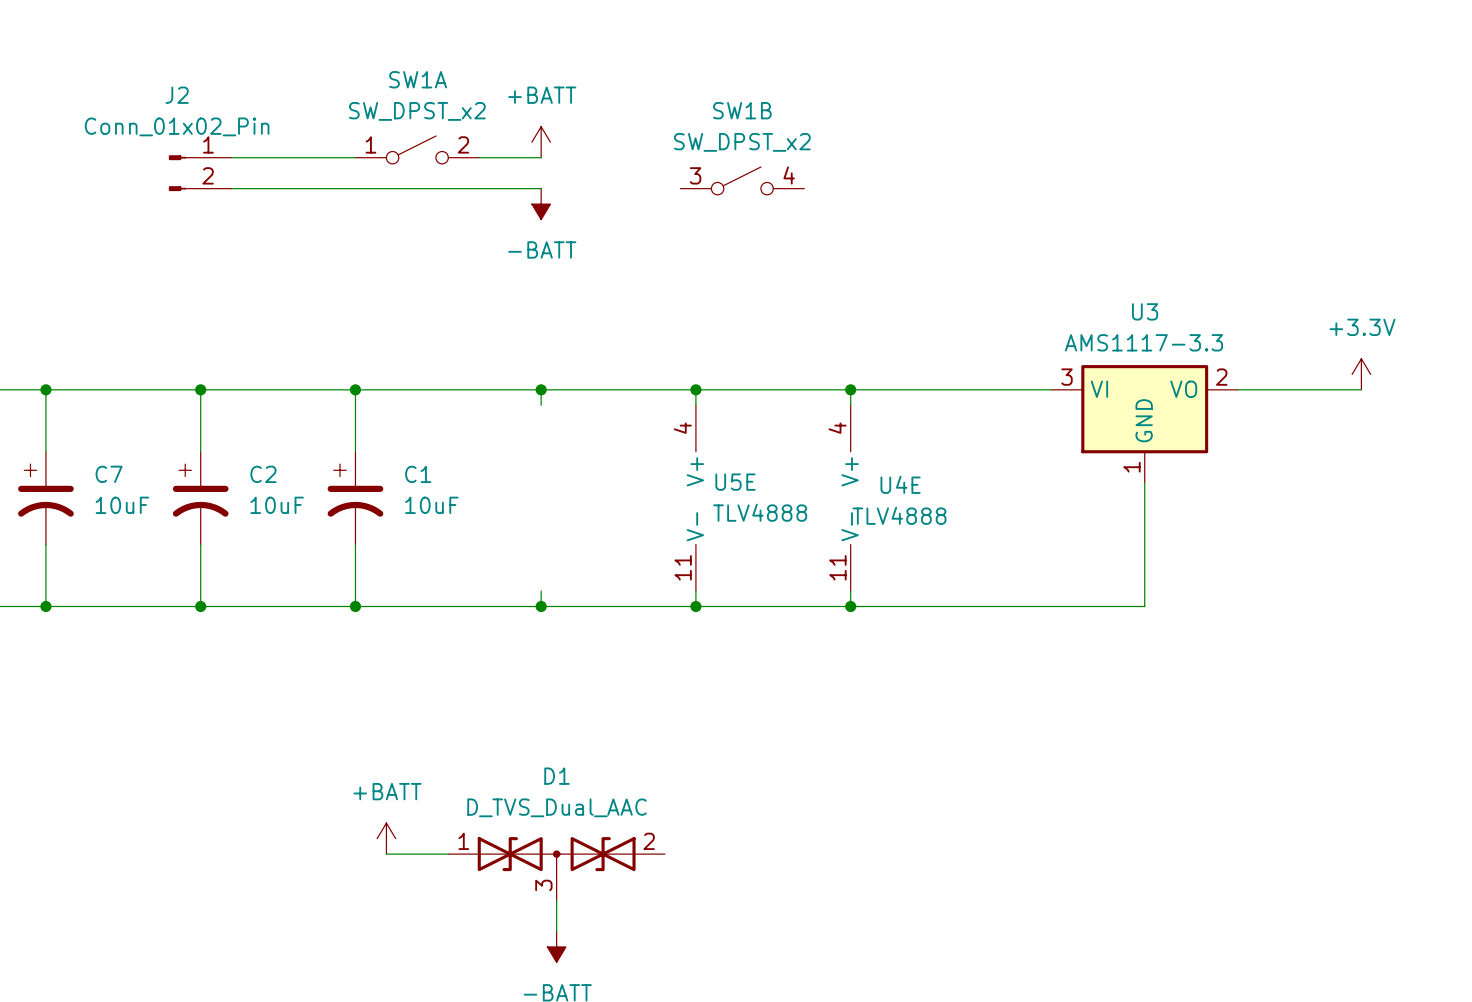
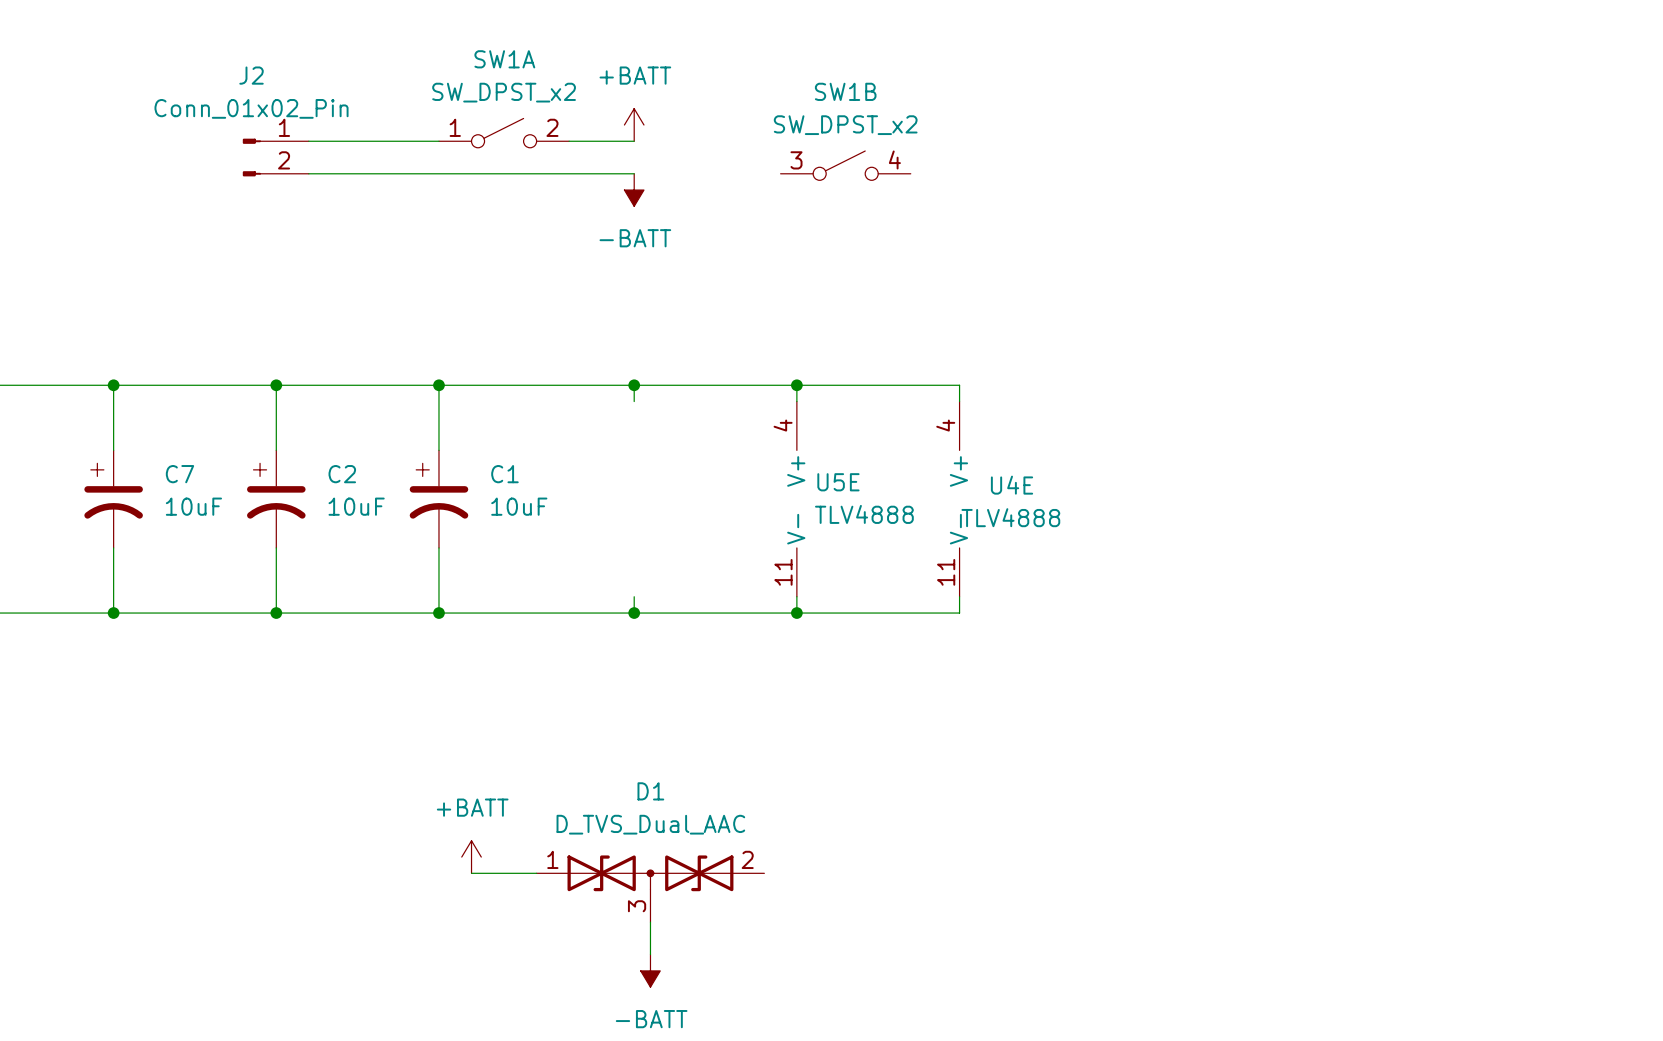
power symbol: +3.3V (1361, 374) -> none
wire: (850, 389) (1051, 389) -> none
junction: (850, 389) -> none
wire: (1237, 389) (1361, 389) -> none
U3: AMS1117-3.3 (1144, 423) -> none
wire: (1144, 482) (1144, 606) (850, 606) -> none
junction: (850, 606) -> none

